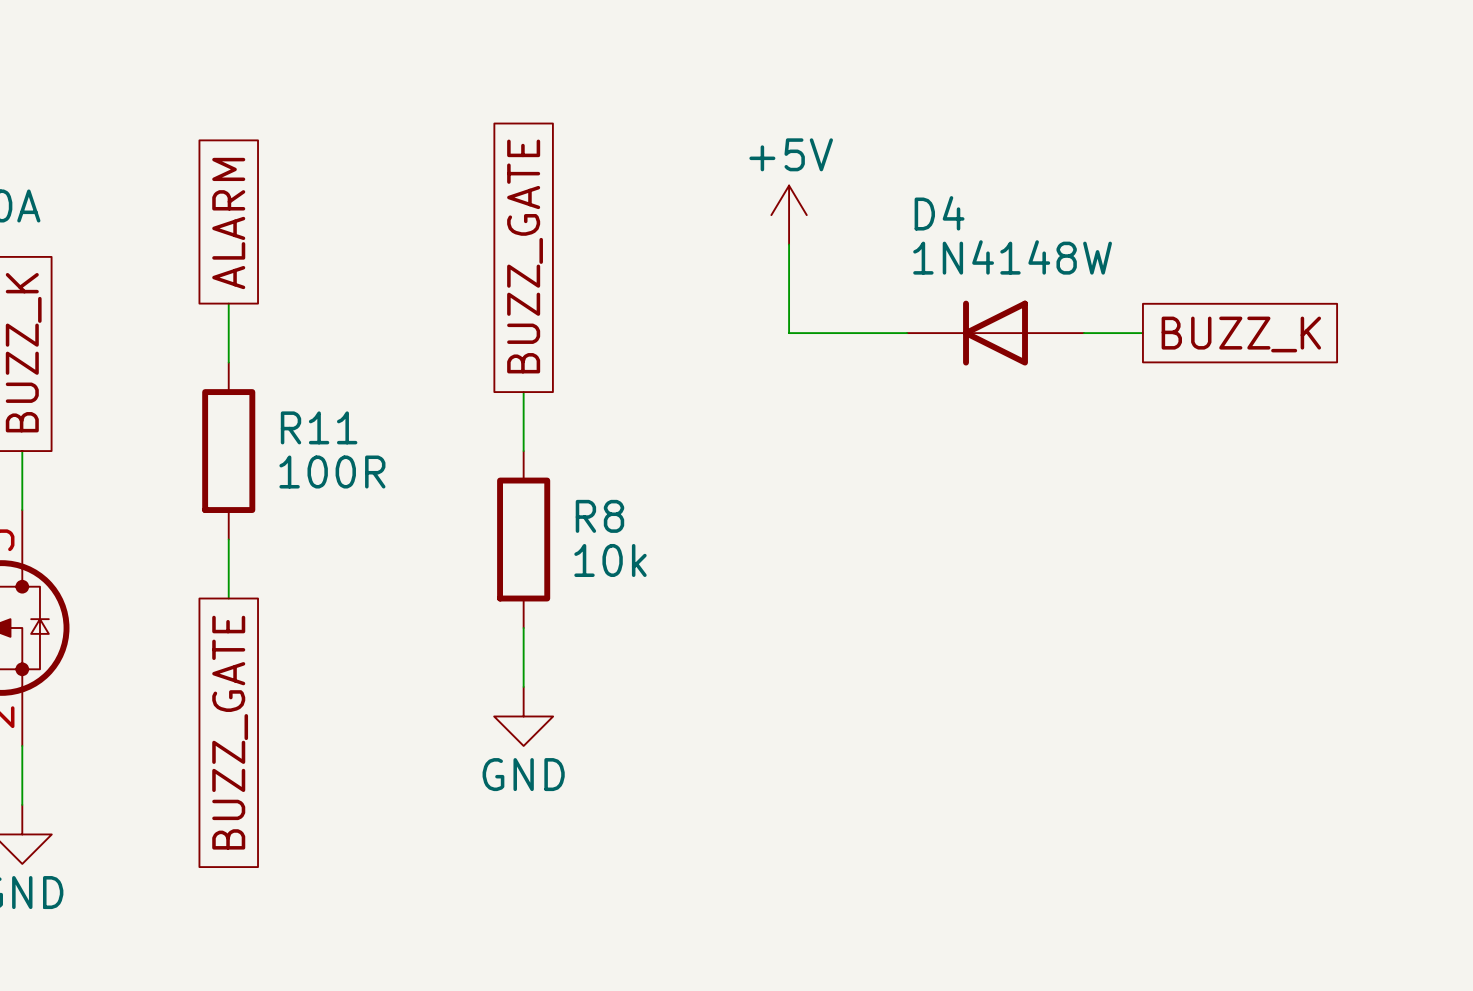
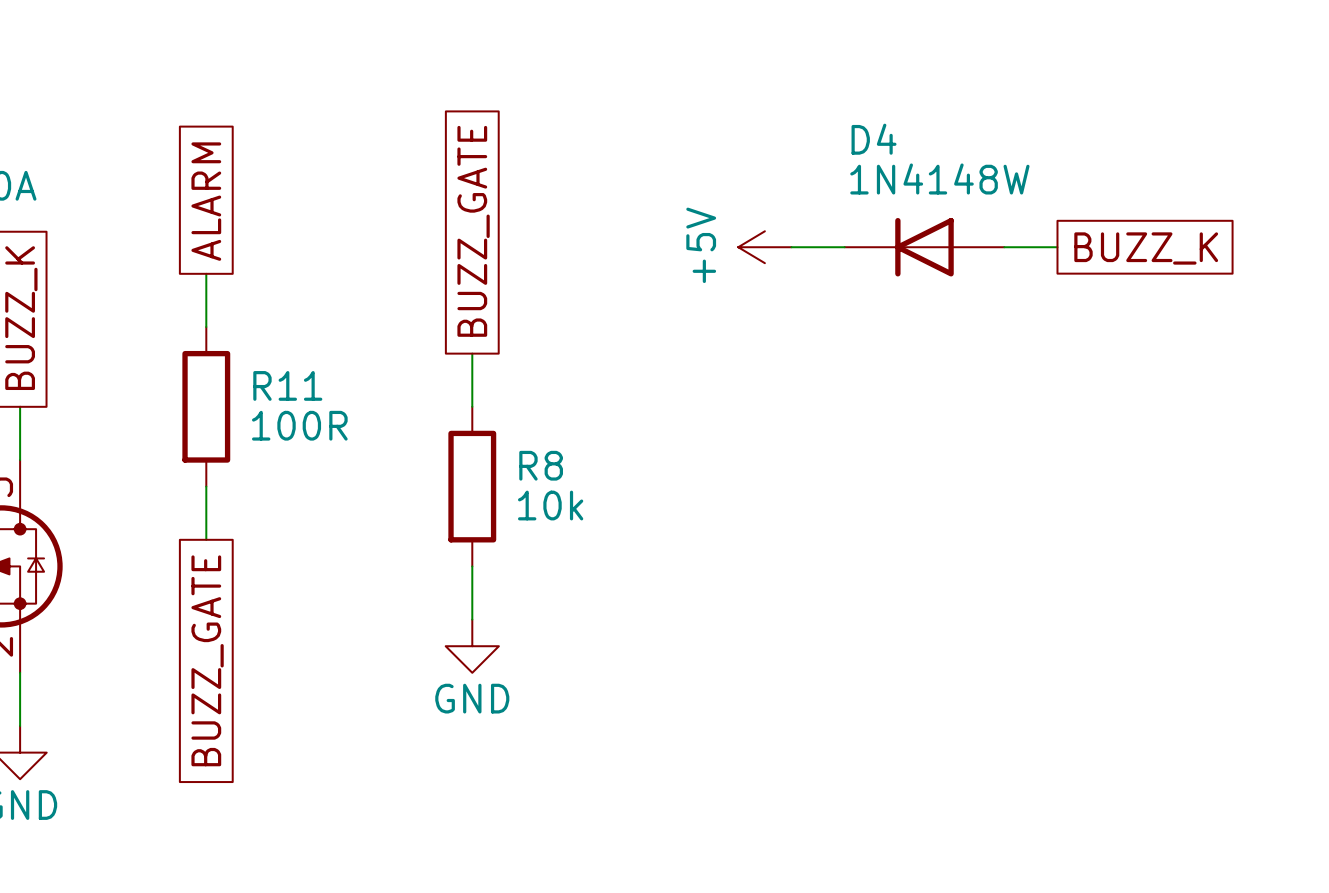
power symbol rotation: 0° (789, 215) -> 90° counterclockwise (764, 247)
power symbol position: +5V (789, 215) -> +5V (764, 247)
wire: (789, 244) (789, 333) (907, 333) -> none
wire: none -> (791, 247) (844, 247)
D4 position: (995, 333) -> (924, 247)
wire: (1083, 333) (1142, 333) -> (1004, 247) (1057, 247)
global label position: BUZZ_K (1241, 334) -> BUZZ_K (1146, 248)

